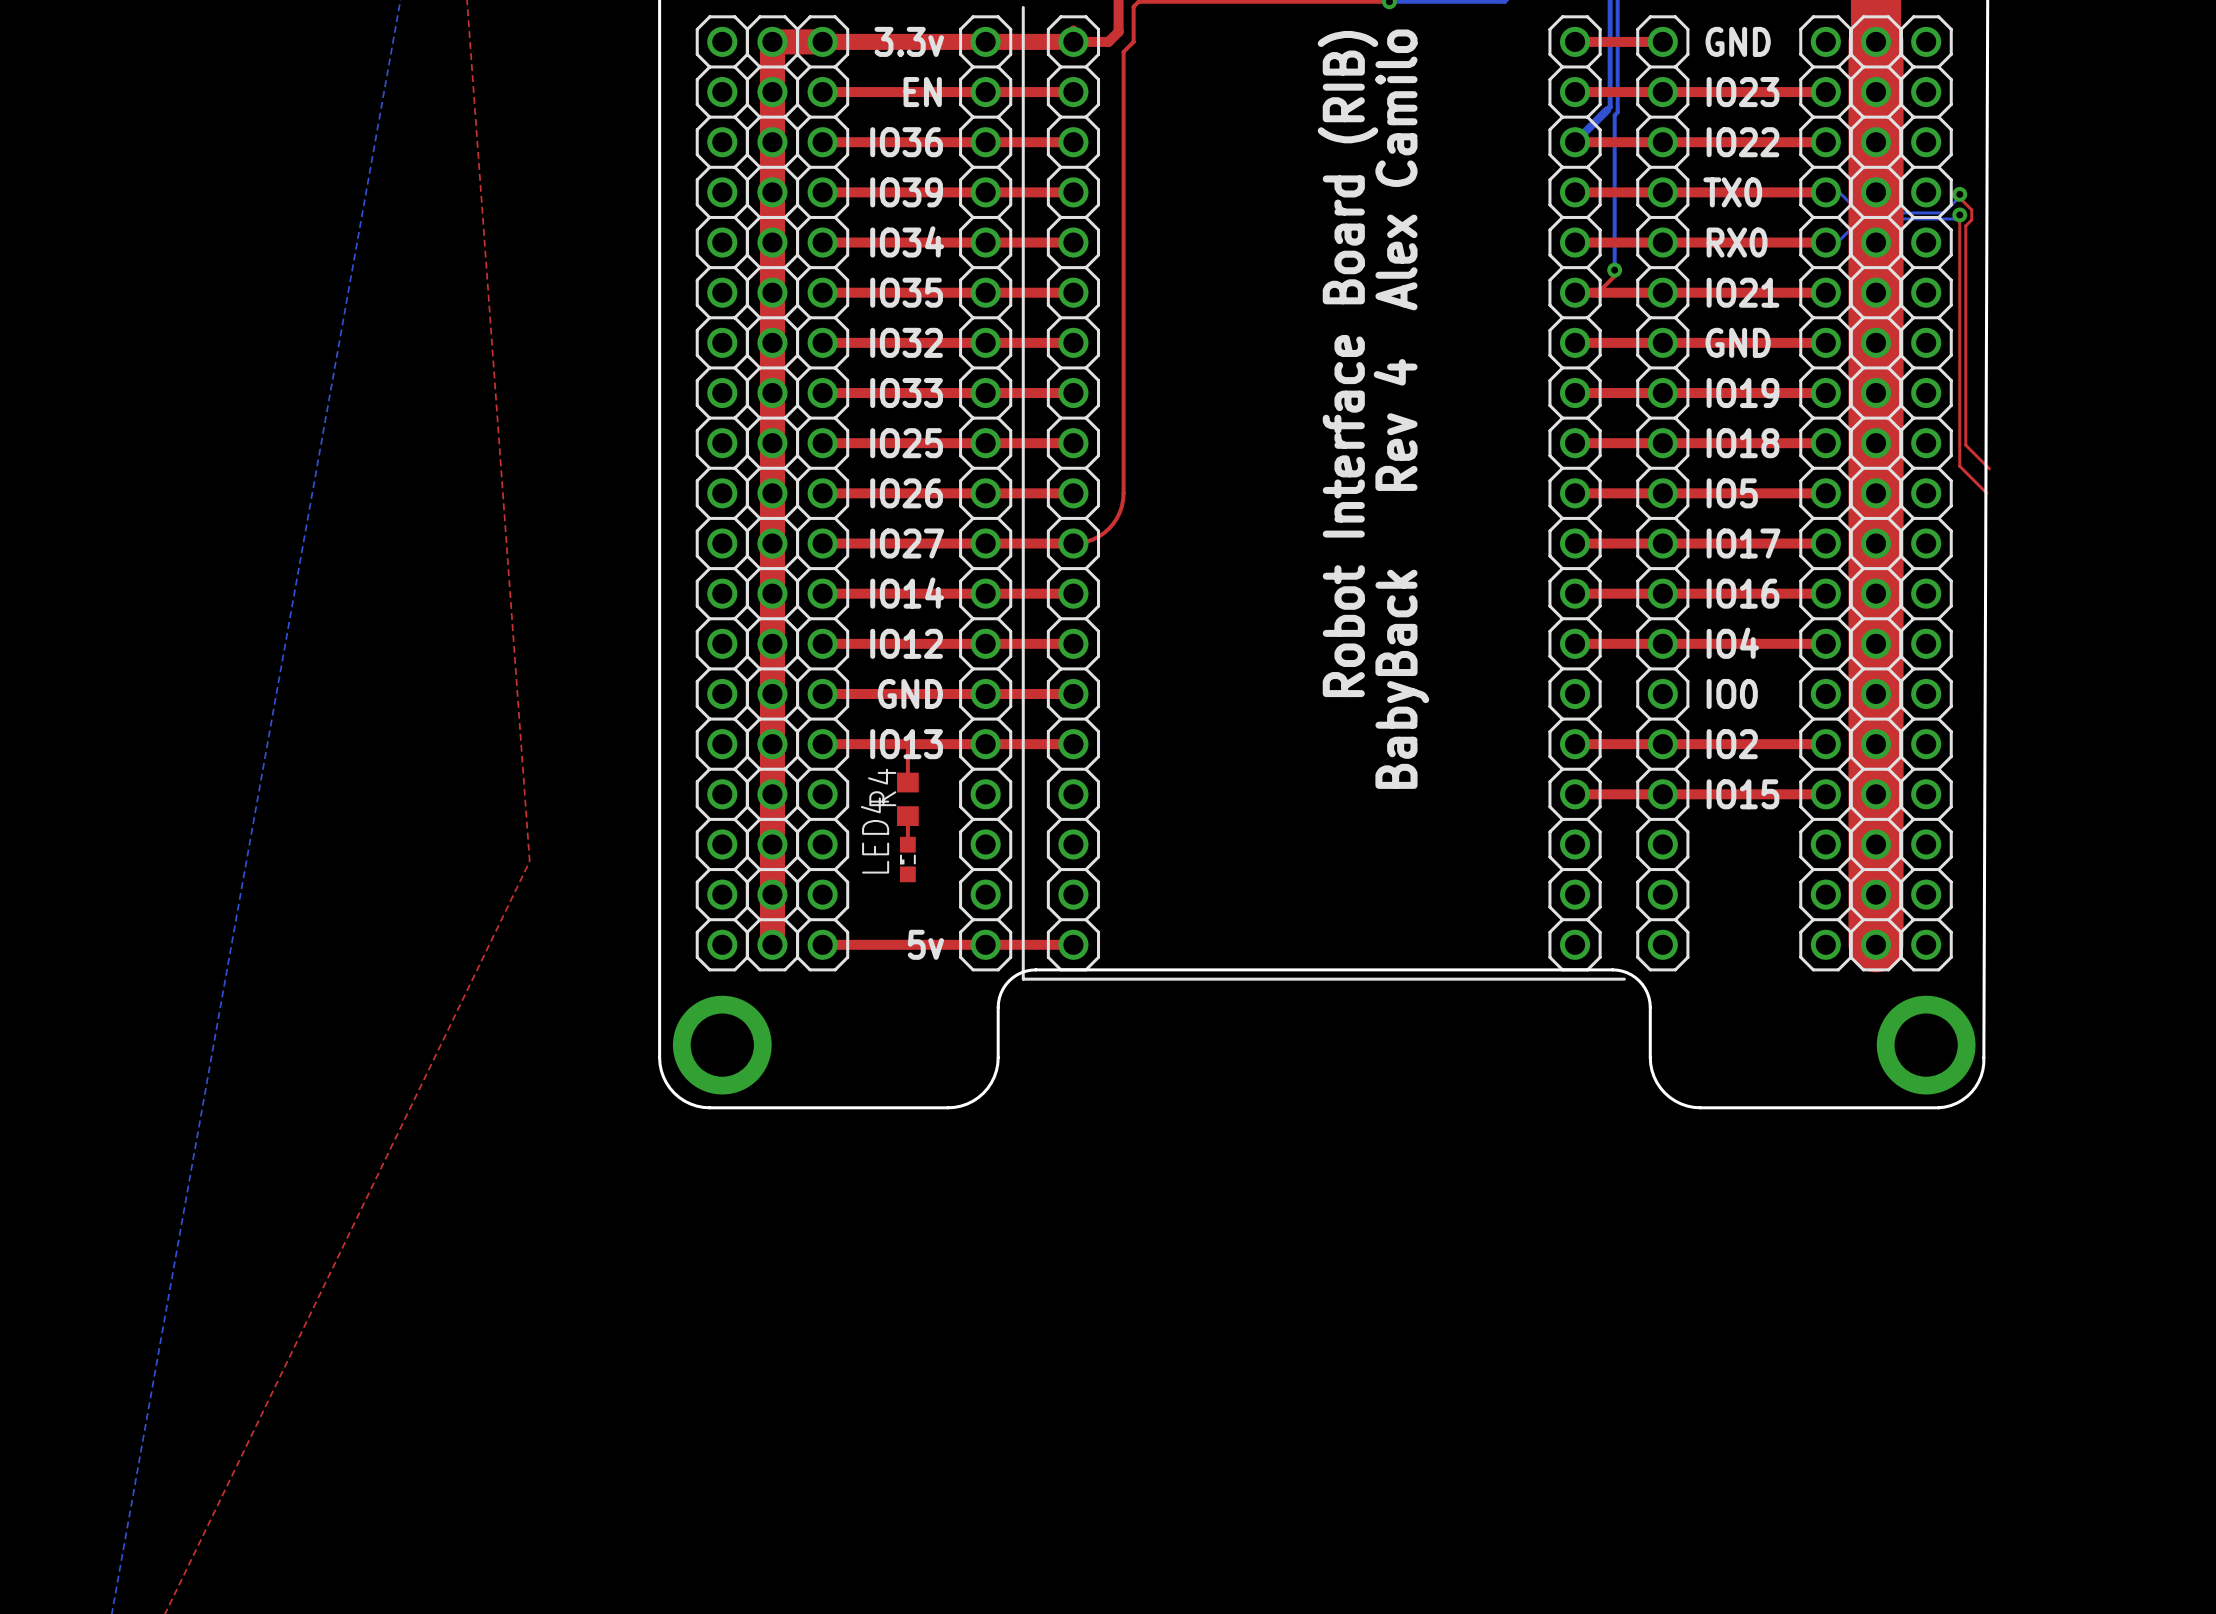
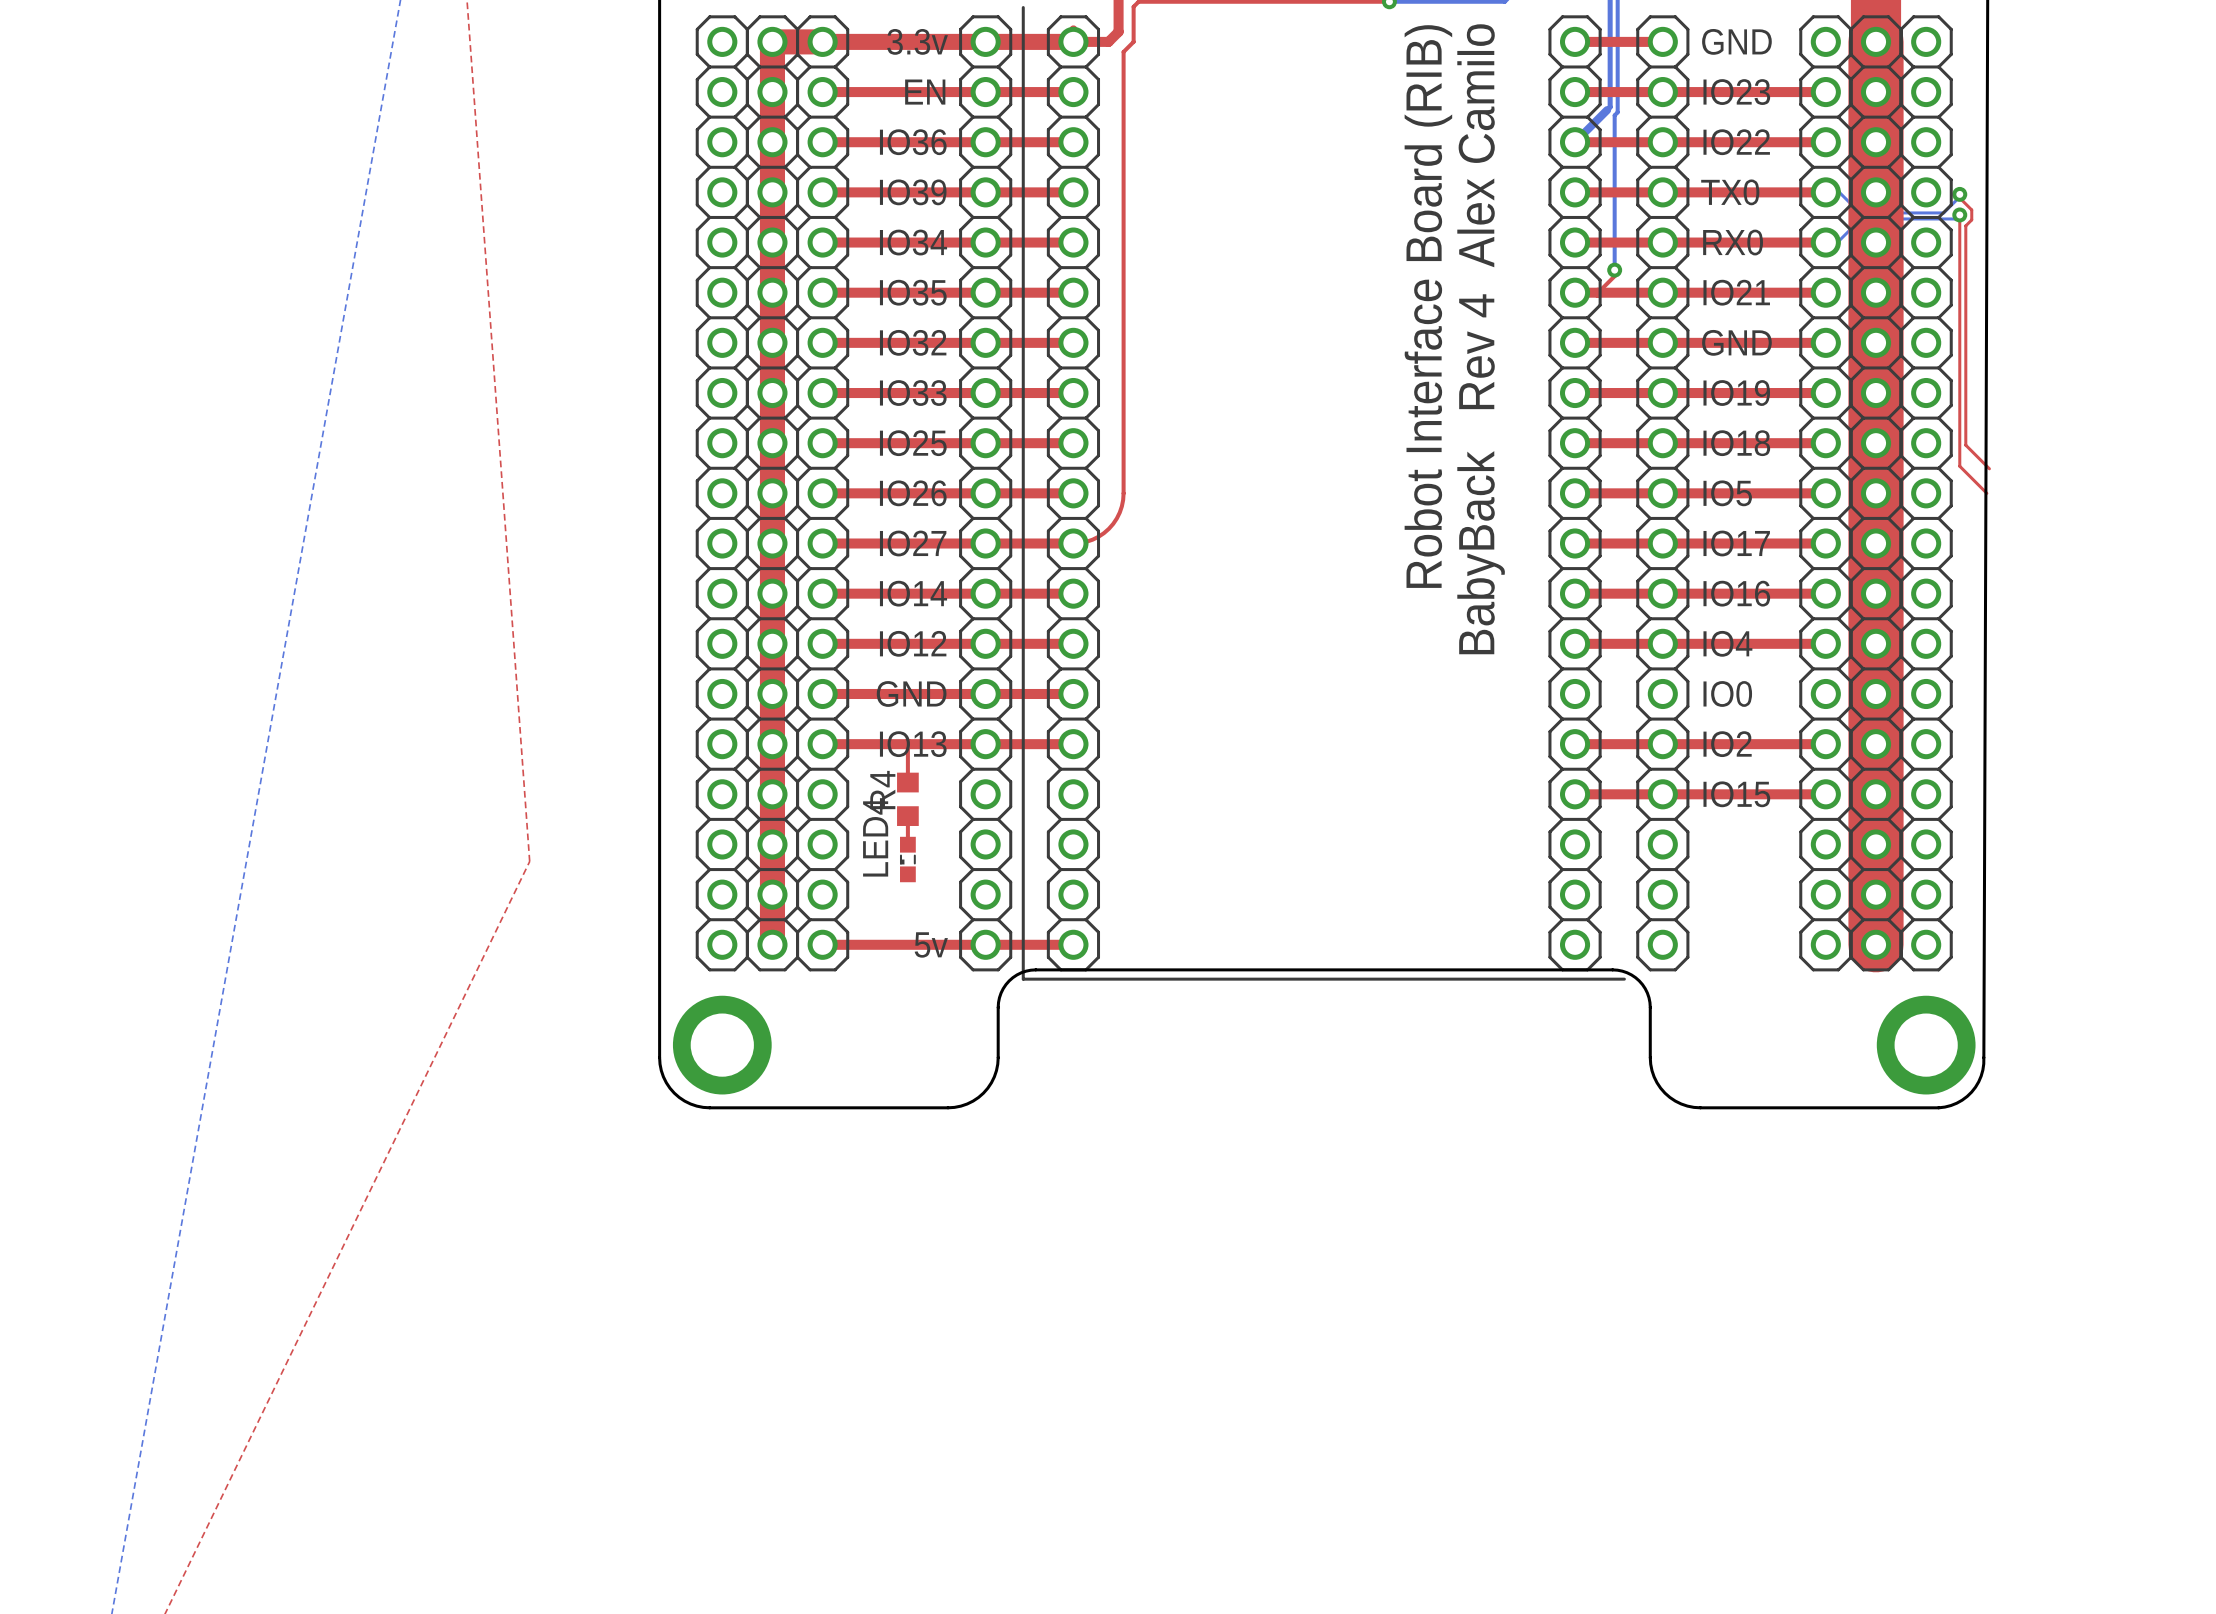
text position: Robot Interface Board (RIB) (1347, 364) -> Robot Interface Board (RIB) (1428, 306)
text position: BabyBack Rev 4 Alex Camilo (1401, 409) -> BabyBack Rev 4 Alex Camilo (1481, 339)

